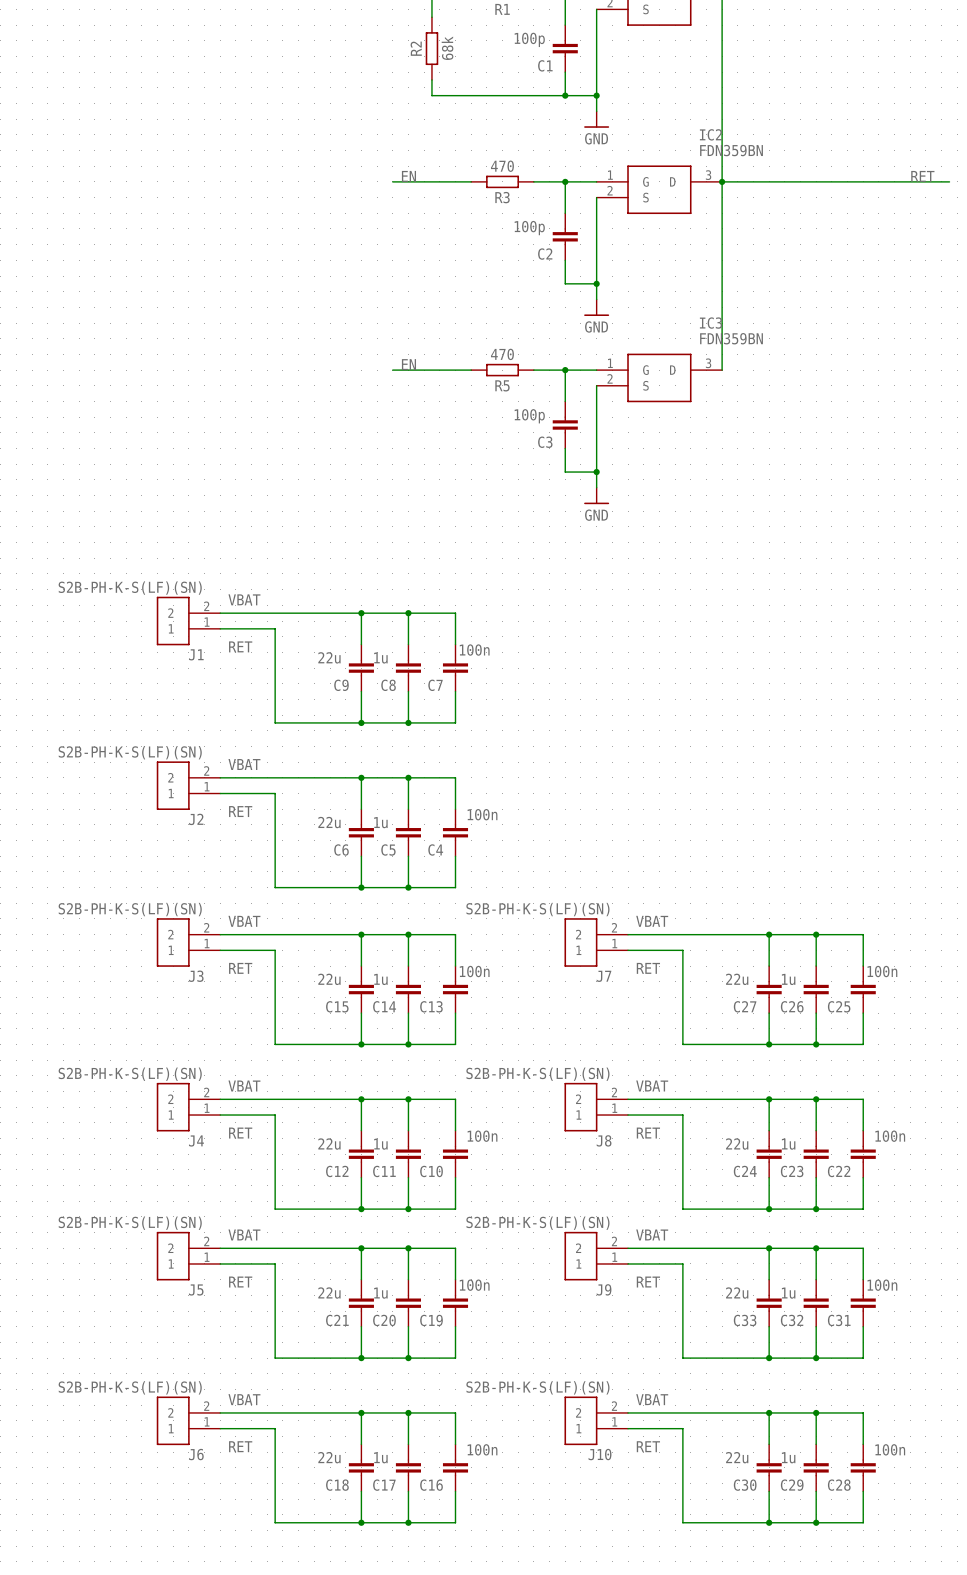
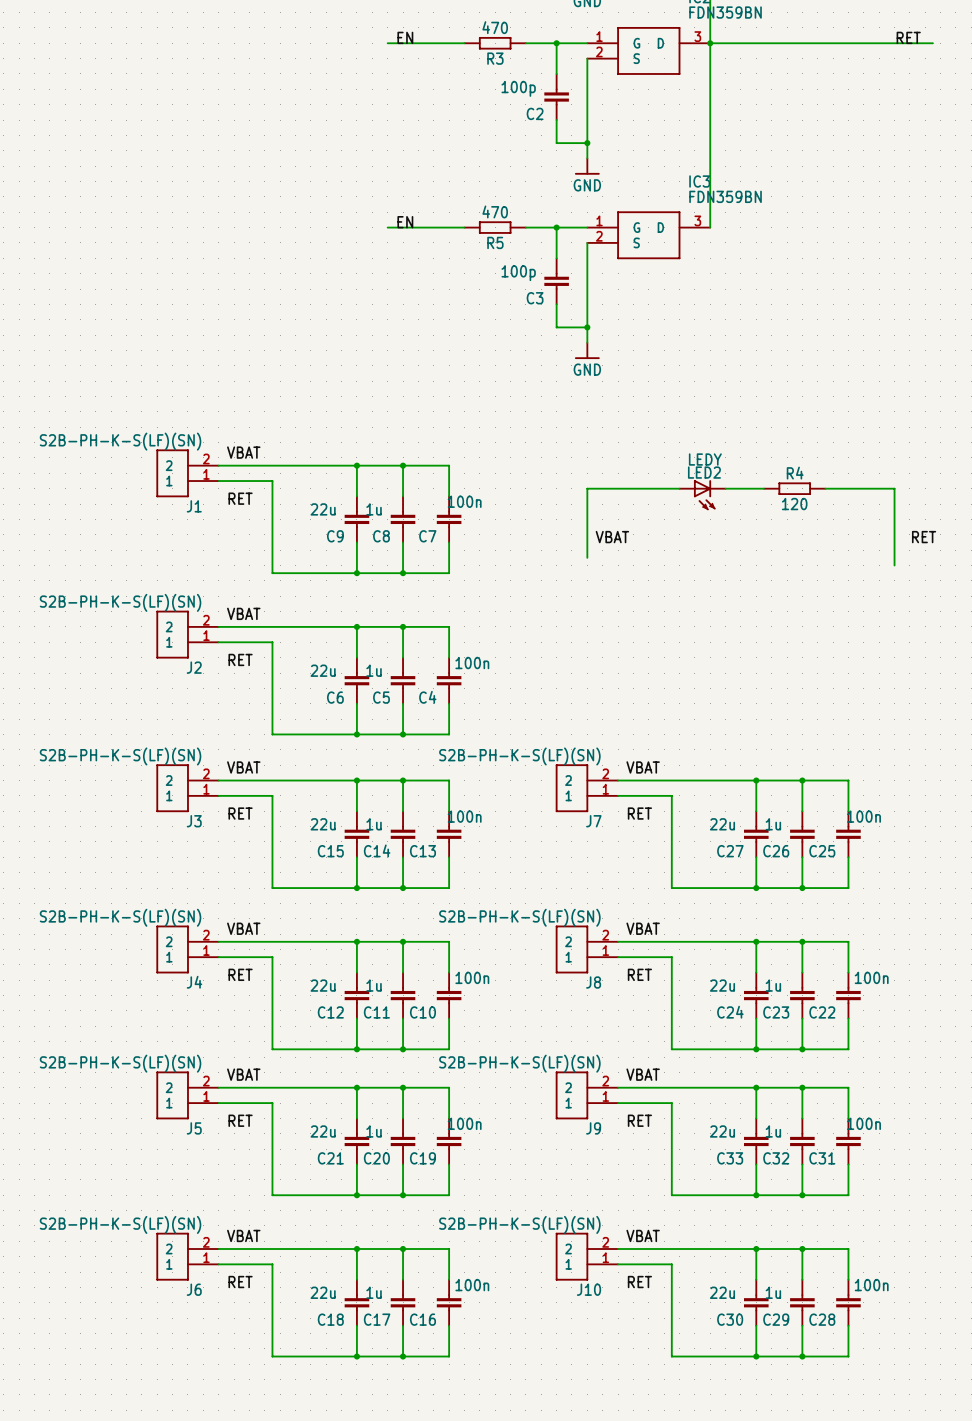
wire: none -> (679, 488) (587, 488) (587, 557)
wire: none -> (725, 488) (763, 488)
R4: none -> 120 (794, 488)
wire: none -> (825, 488) (894, 488) (894, 565)
LED2: none -> LEDY (702, 495)
label: none -> VBAT (612, 537)
label: none -> RET (924, 537)

